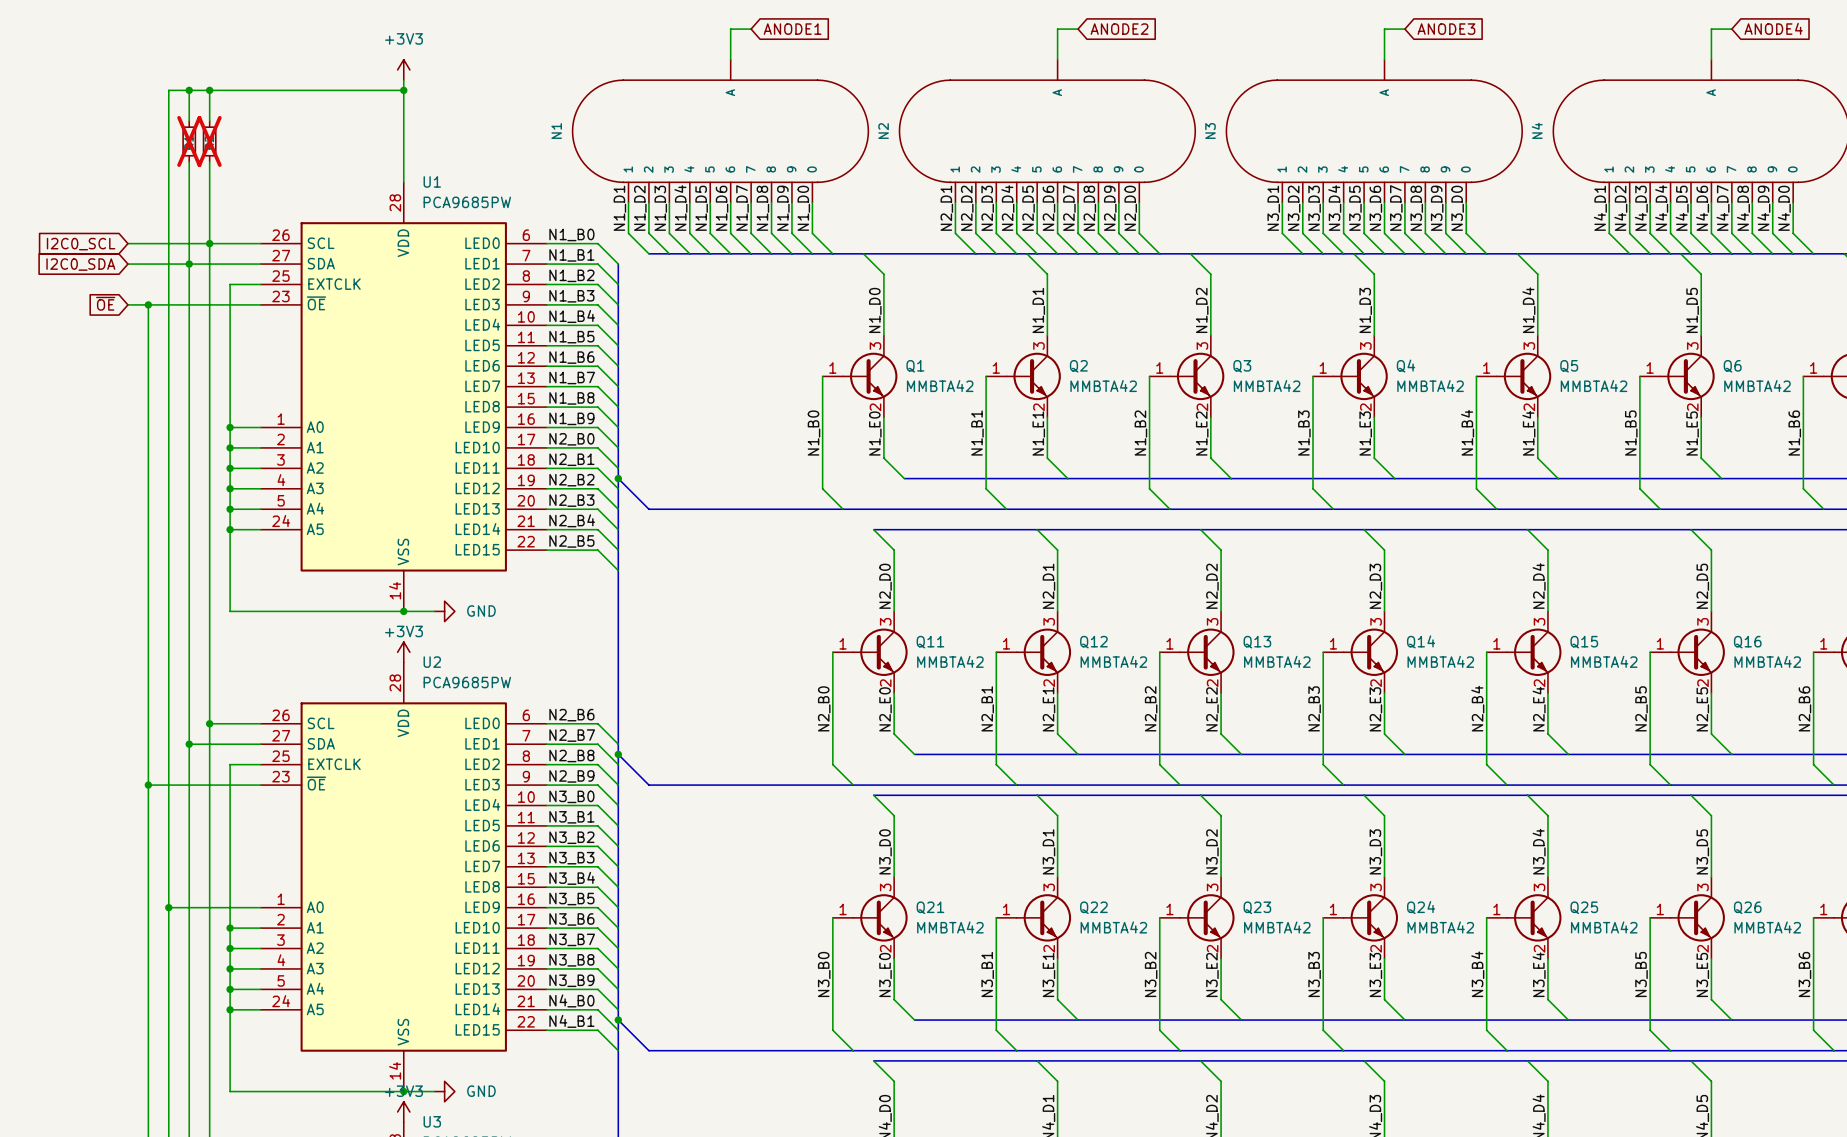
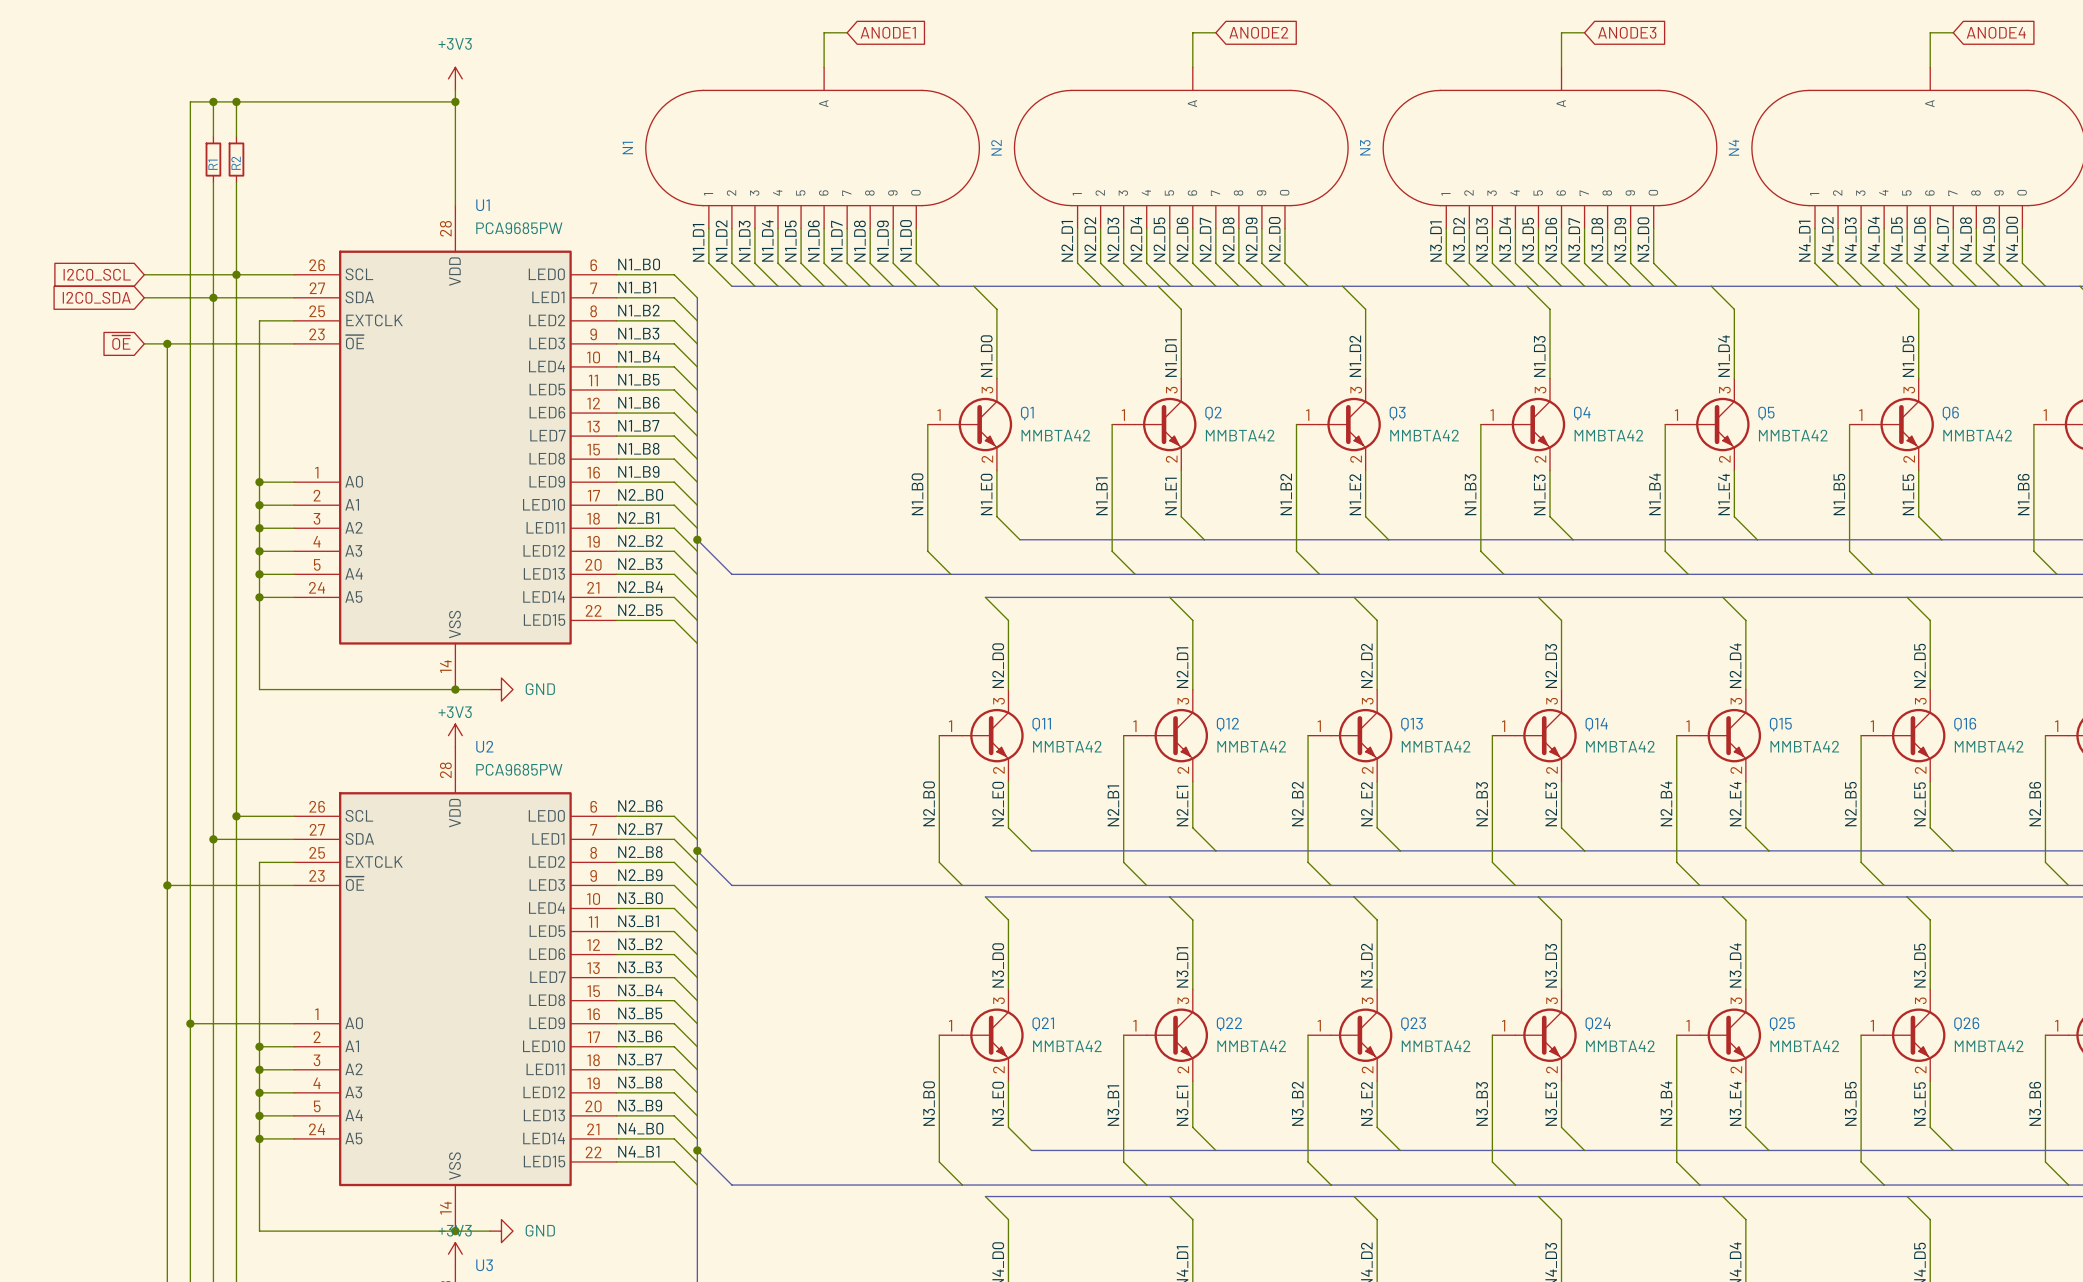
R1 do-not-place cross: (189, 141) -> none
R2 do-not-place cross: (209, 141) -> none

